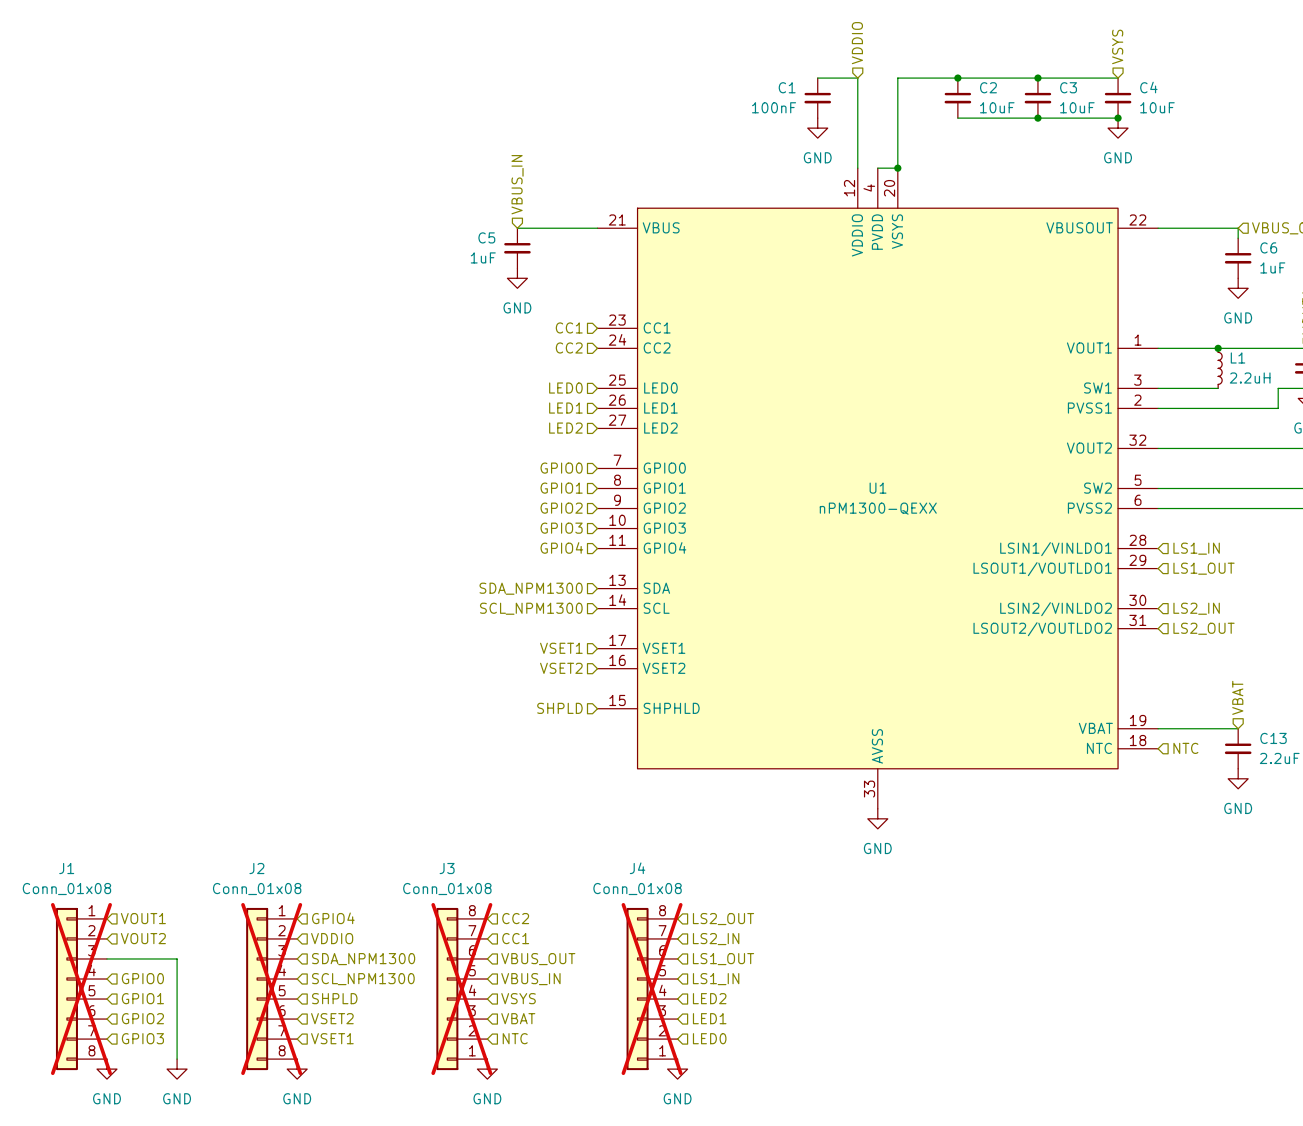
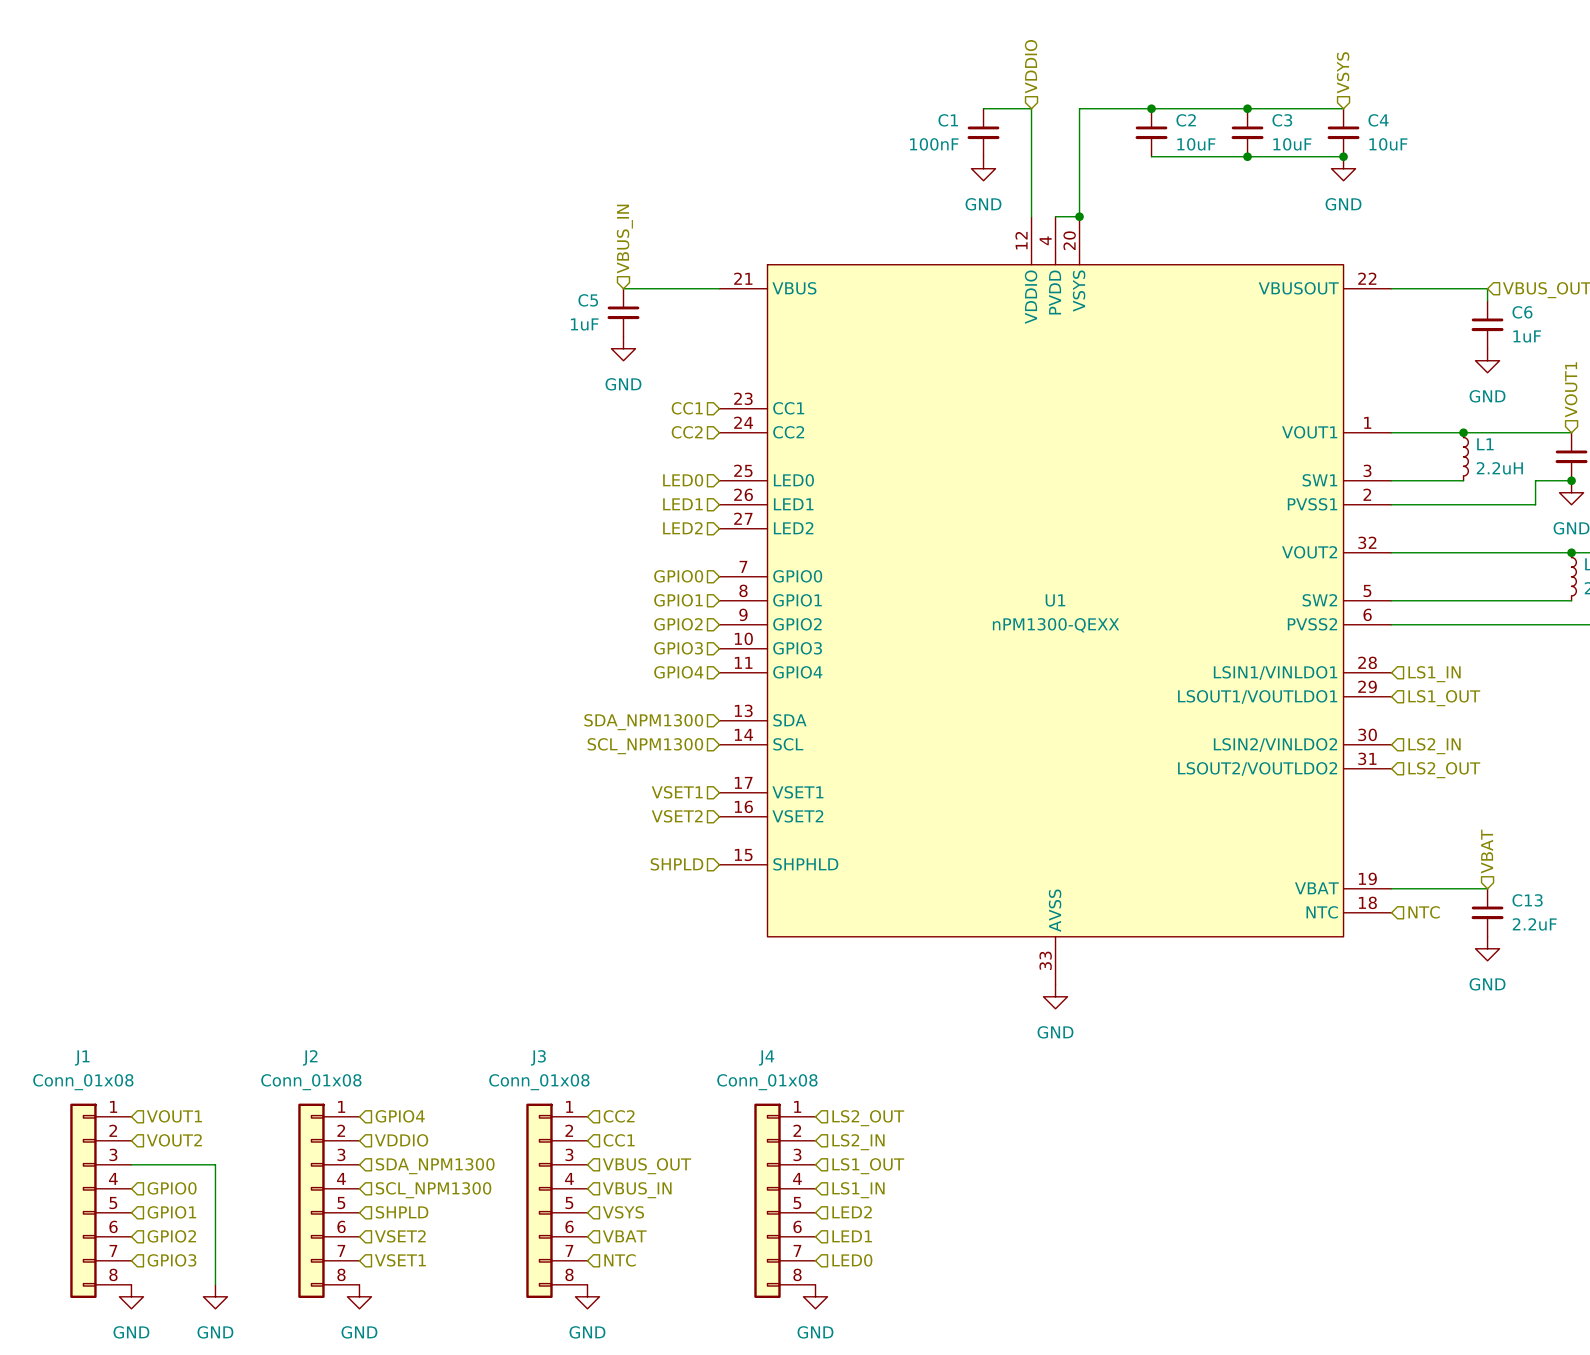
J1 do-not-place cross: (81, 989) -> none
J2 do-not-place cross: (271, 989) -> none
J3 flip: as is (447, 989) -> up-down (539, 1200)
J3 do-not-place cross: (461, 989) -> none
J4 flip: as is (637, 989) -> up-down (767, 1200)
J4 do-not-place cross: (652, 989) -> none

